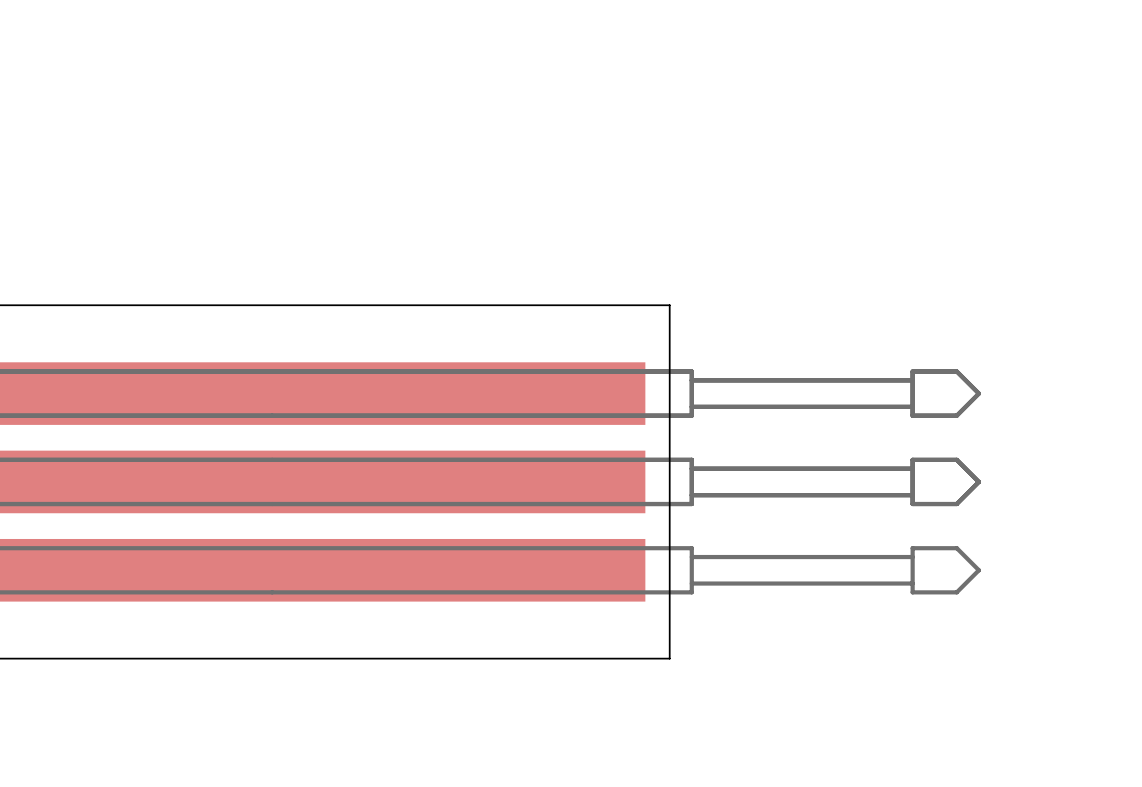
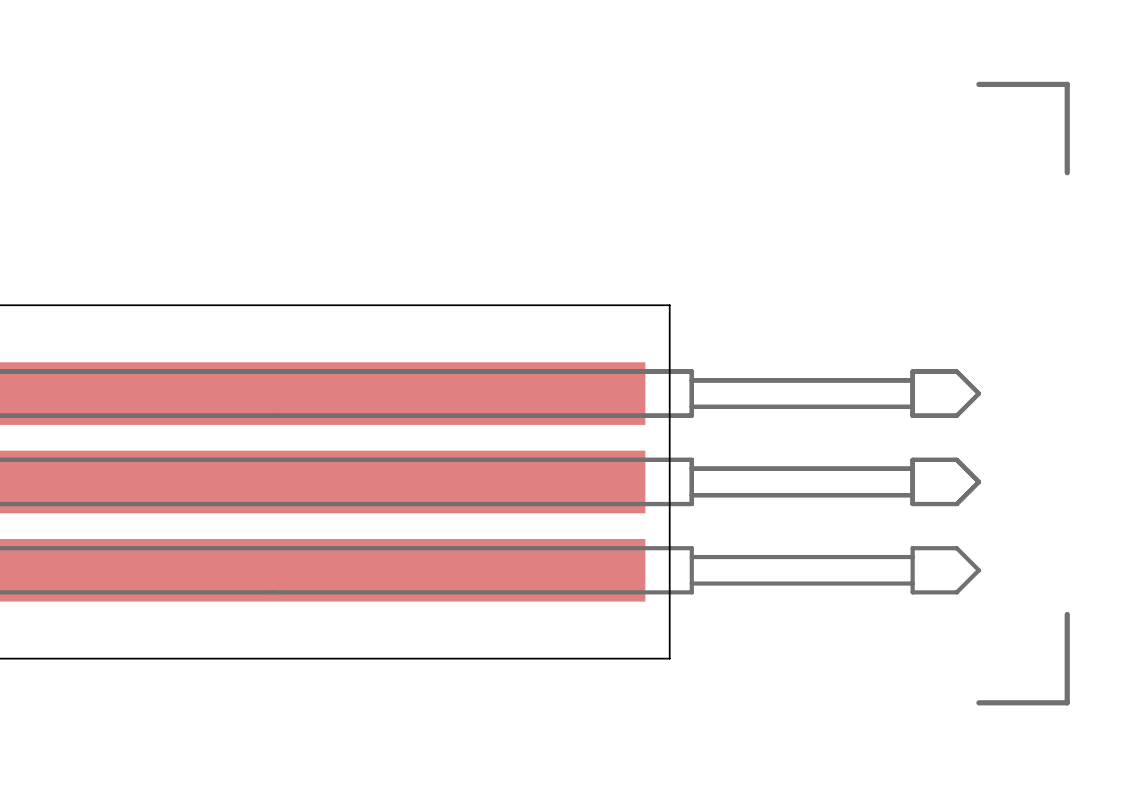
line: none -> (978, 84) (1067, 84) (1067, 172)
line: none -> (1067, 614) (1067, 702) (978, 702)

